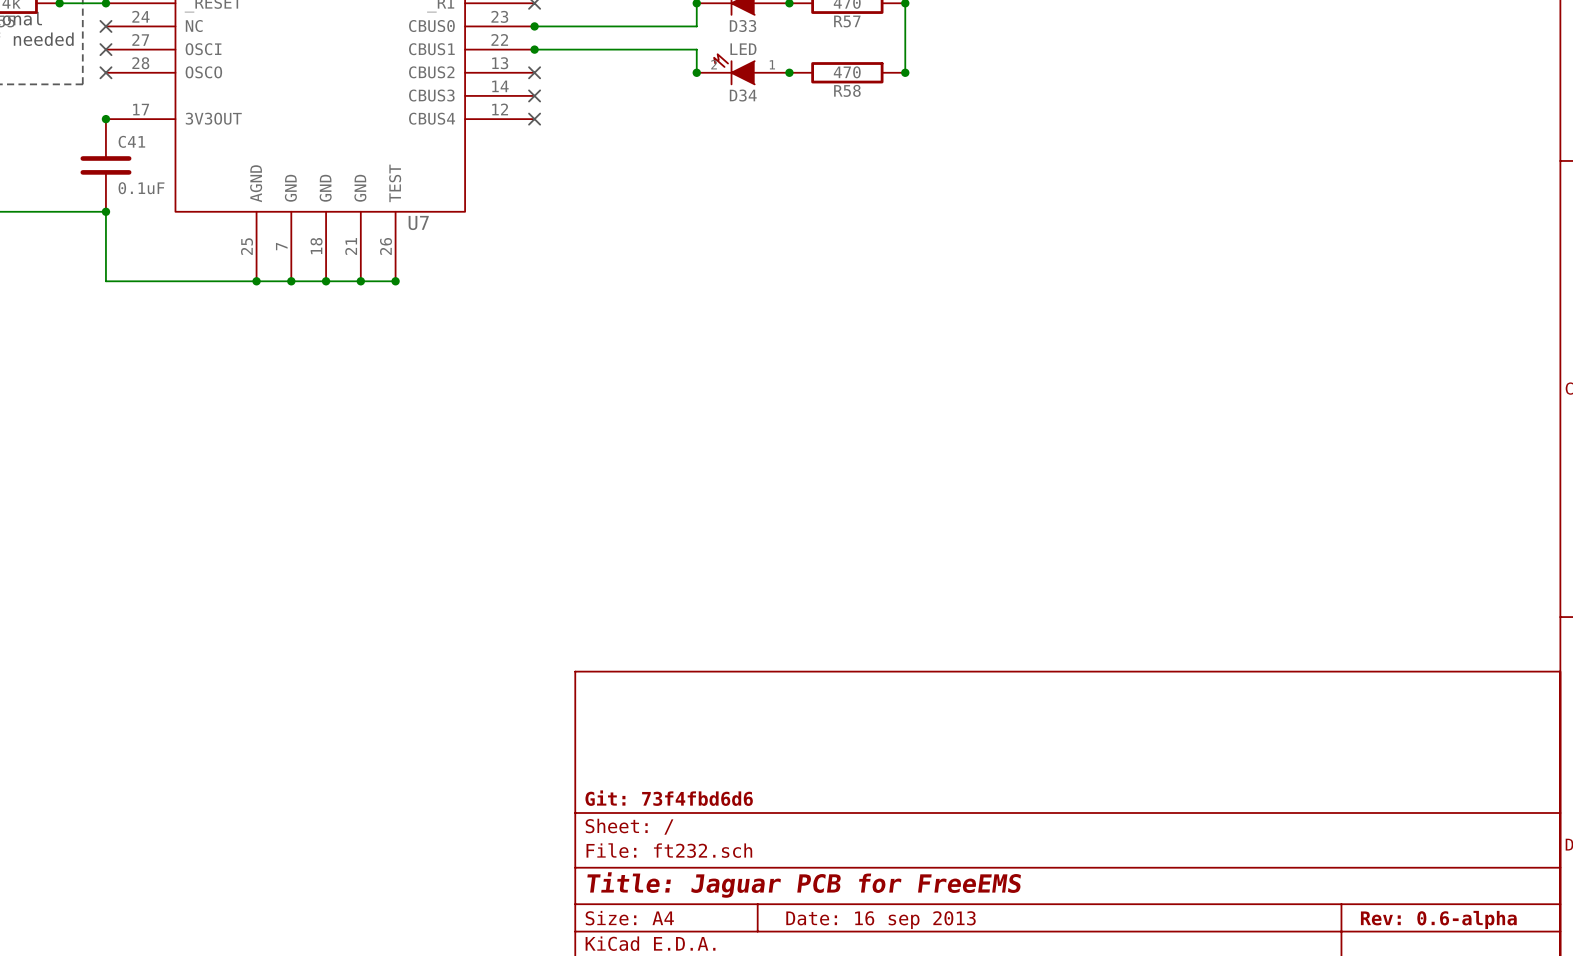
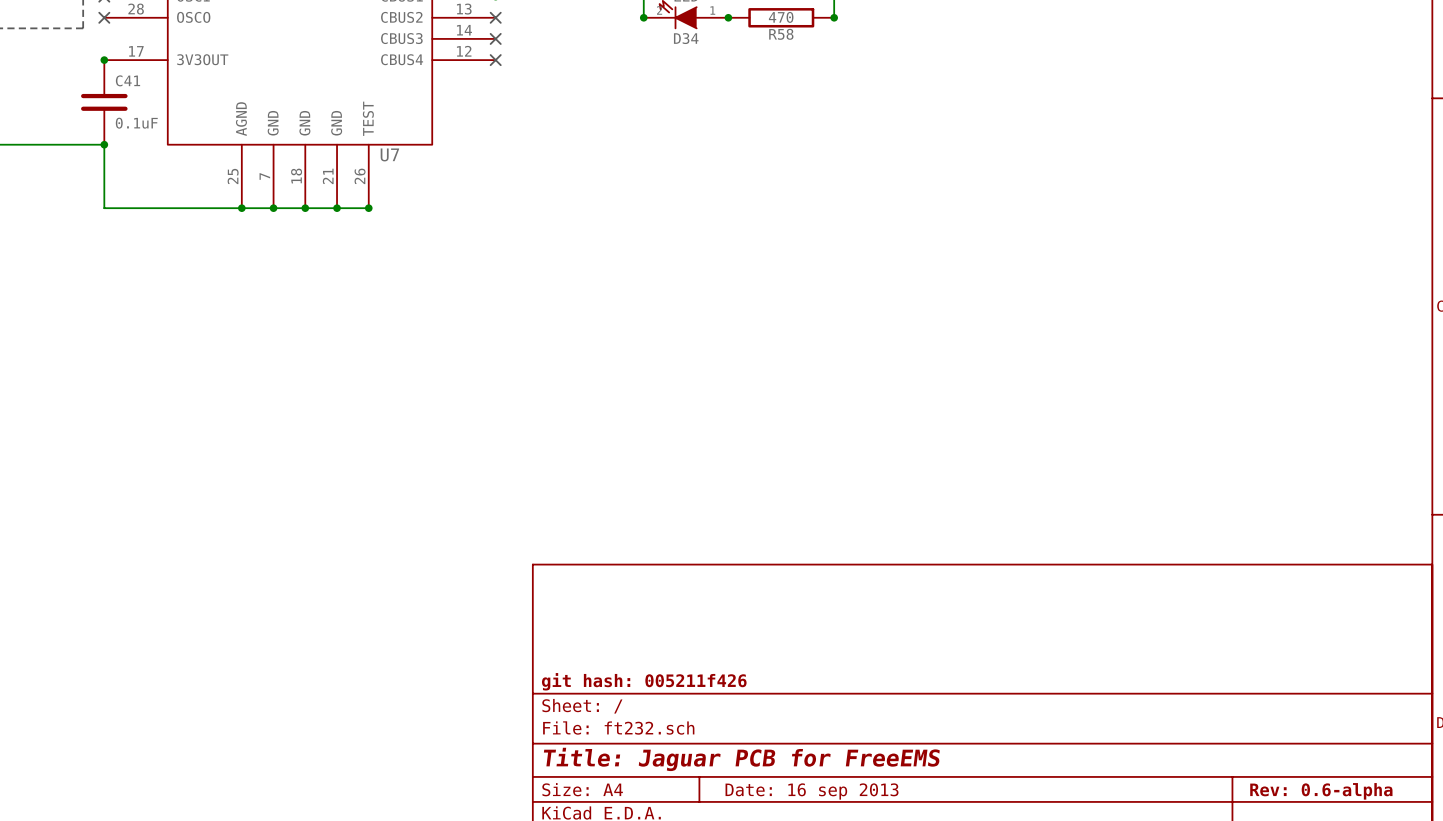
title block: Git: 73f4fbd6d6 (669, 798) -> git hash: 005211f426 (644, 681)

